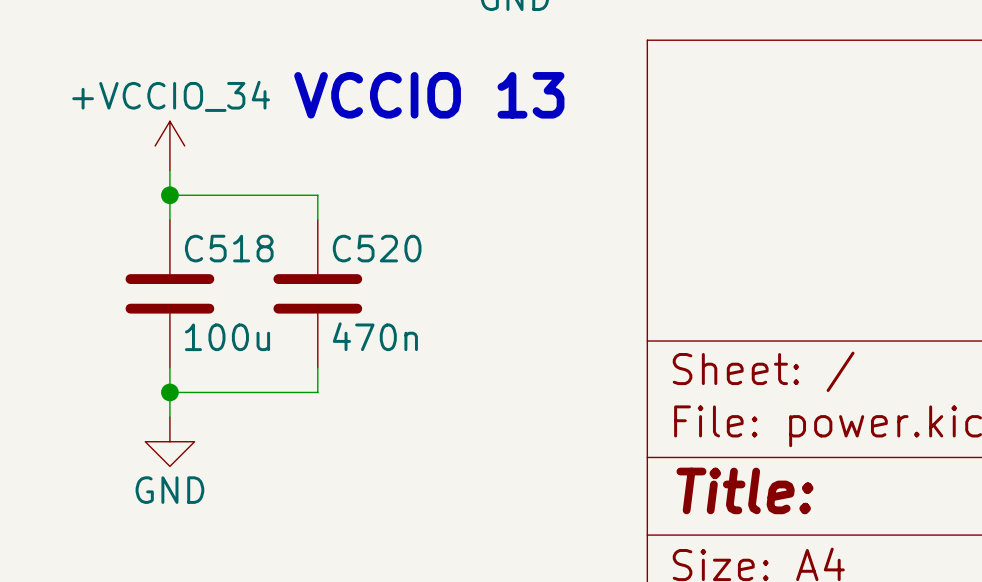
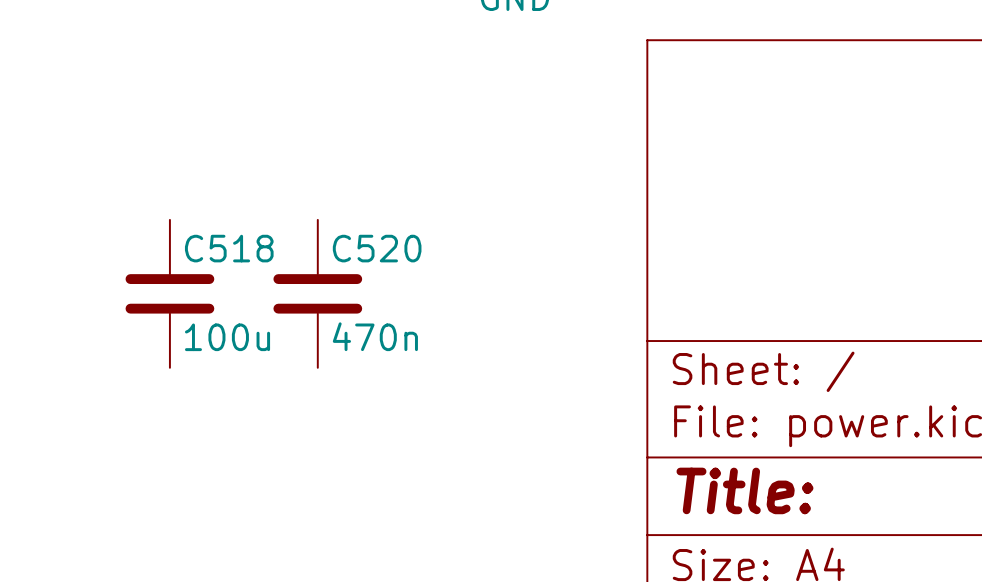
text: VCCIO 13 (429, 95) -> none
power symbol: +VCCIO_34 (169, 145) -> none
wire: (169, 170) (169, 219) -> none
wire: (169, 195) (317, 195) (317, 219) -> none
junction: (169, 195) -> none
wire: (169, 367) (169, 417) -> none
wire: (317, 367) (317, 392) (169, 392) -> none
junction: (169, 392) -> none
power symbol: GND (169, 441) -> none

